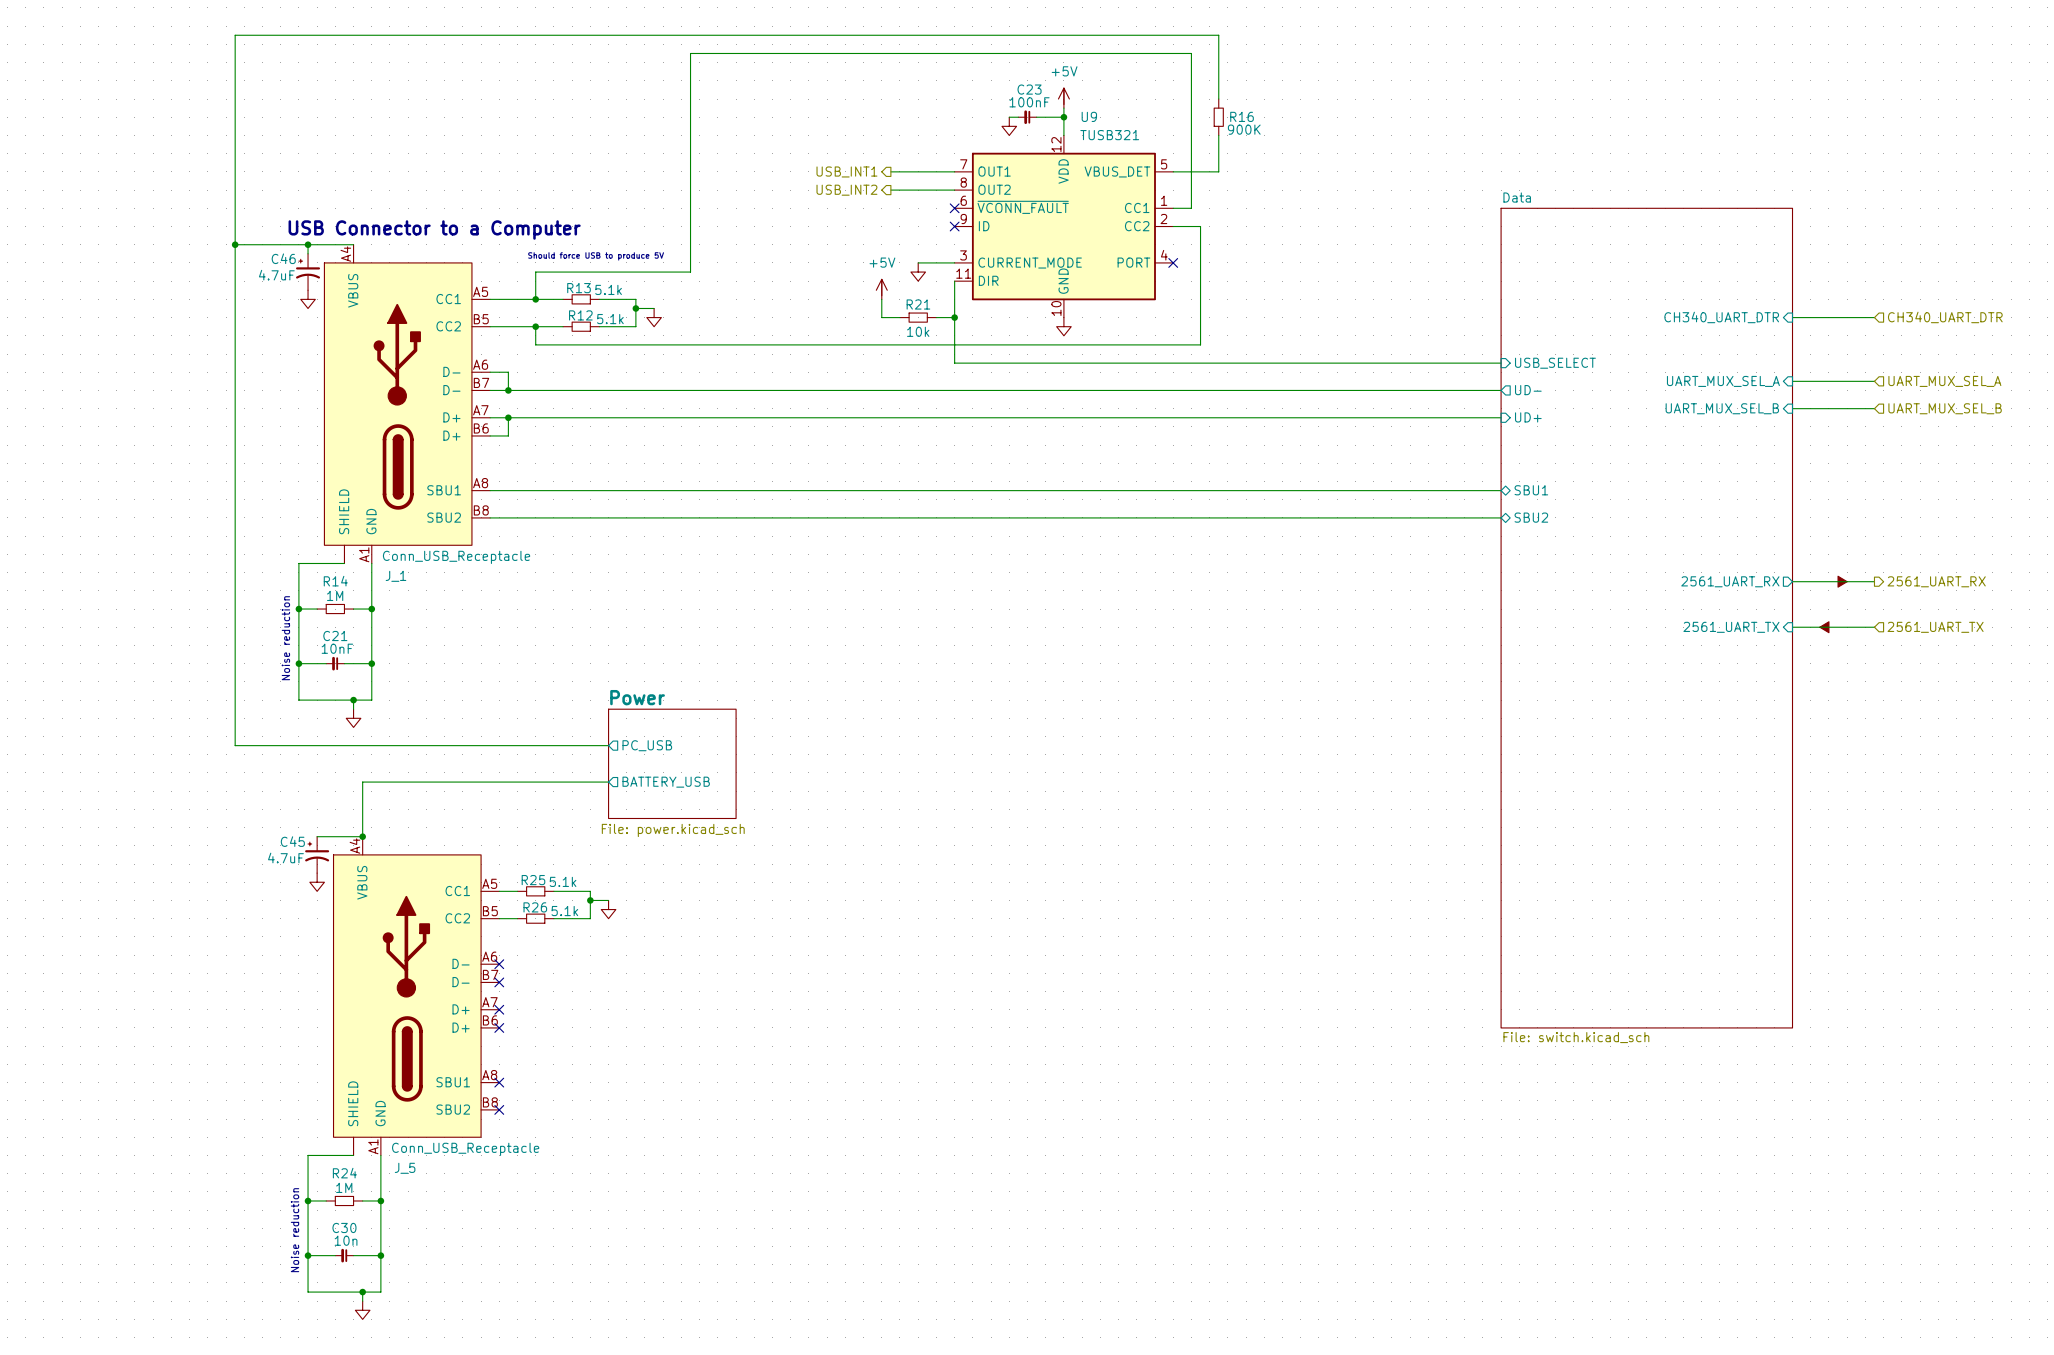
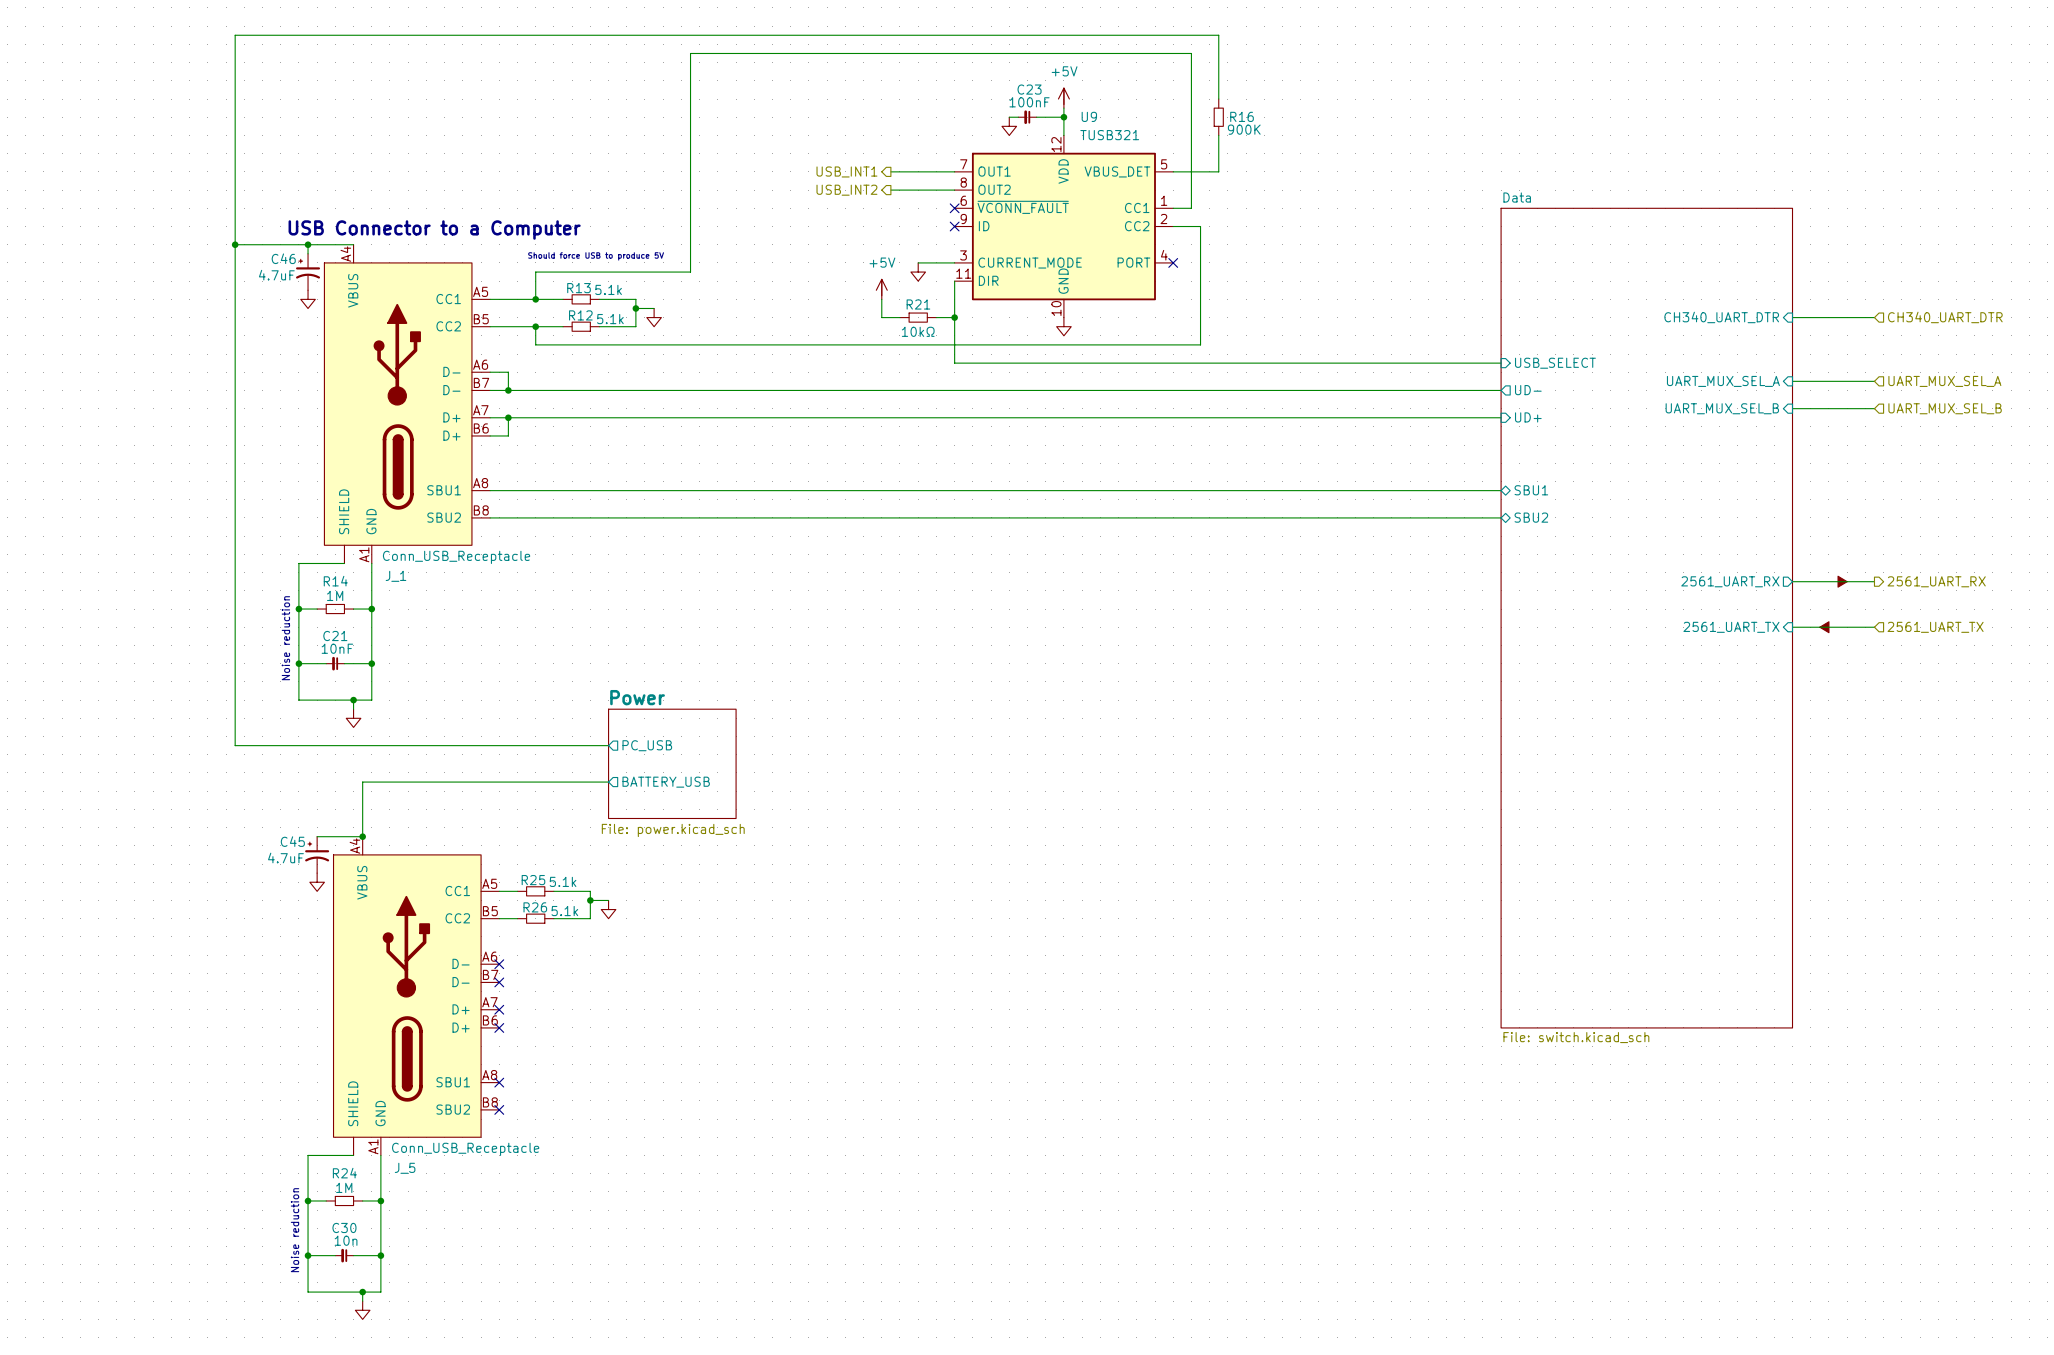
R21 value: 10k (918, 331) -> 10kΩ (918, 331)

